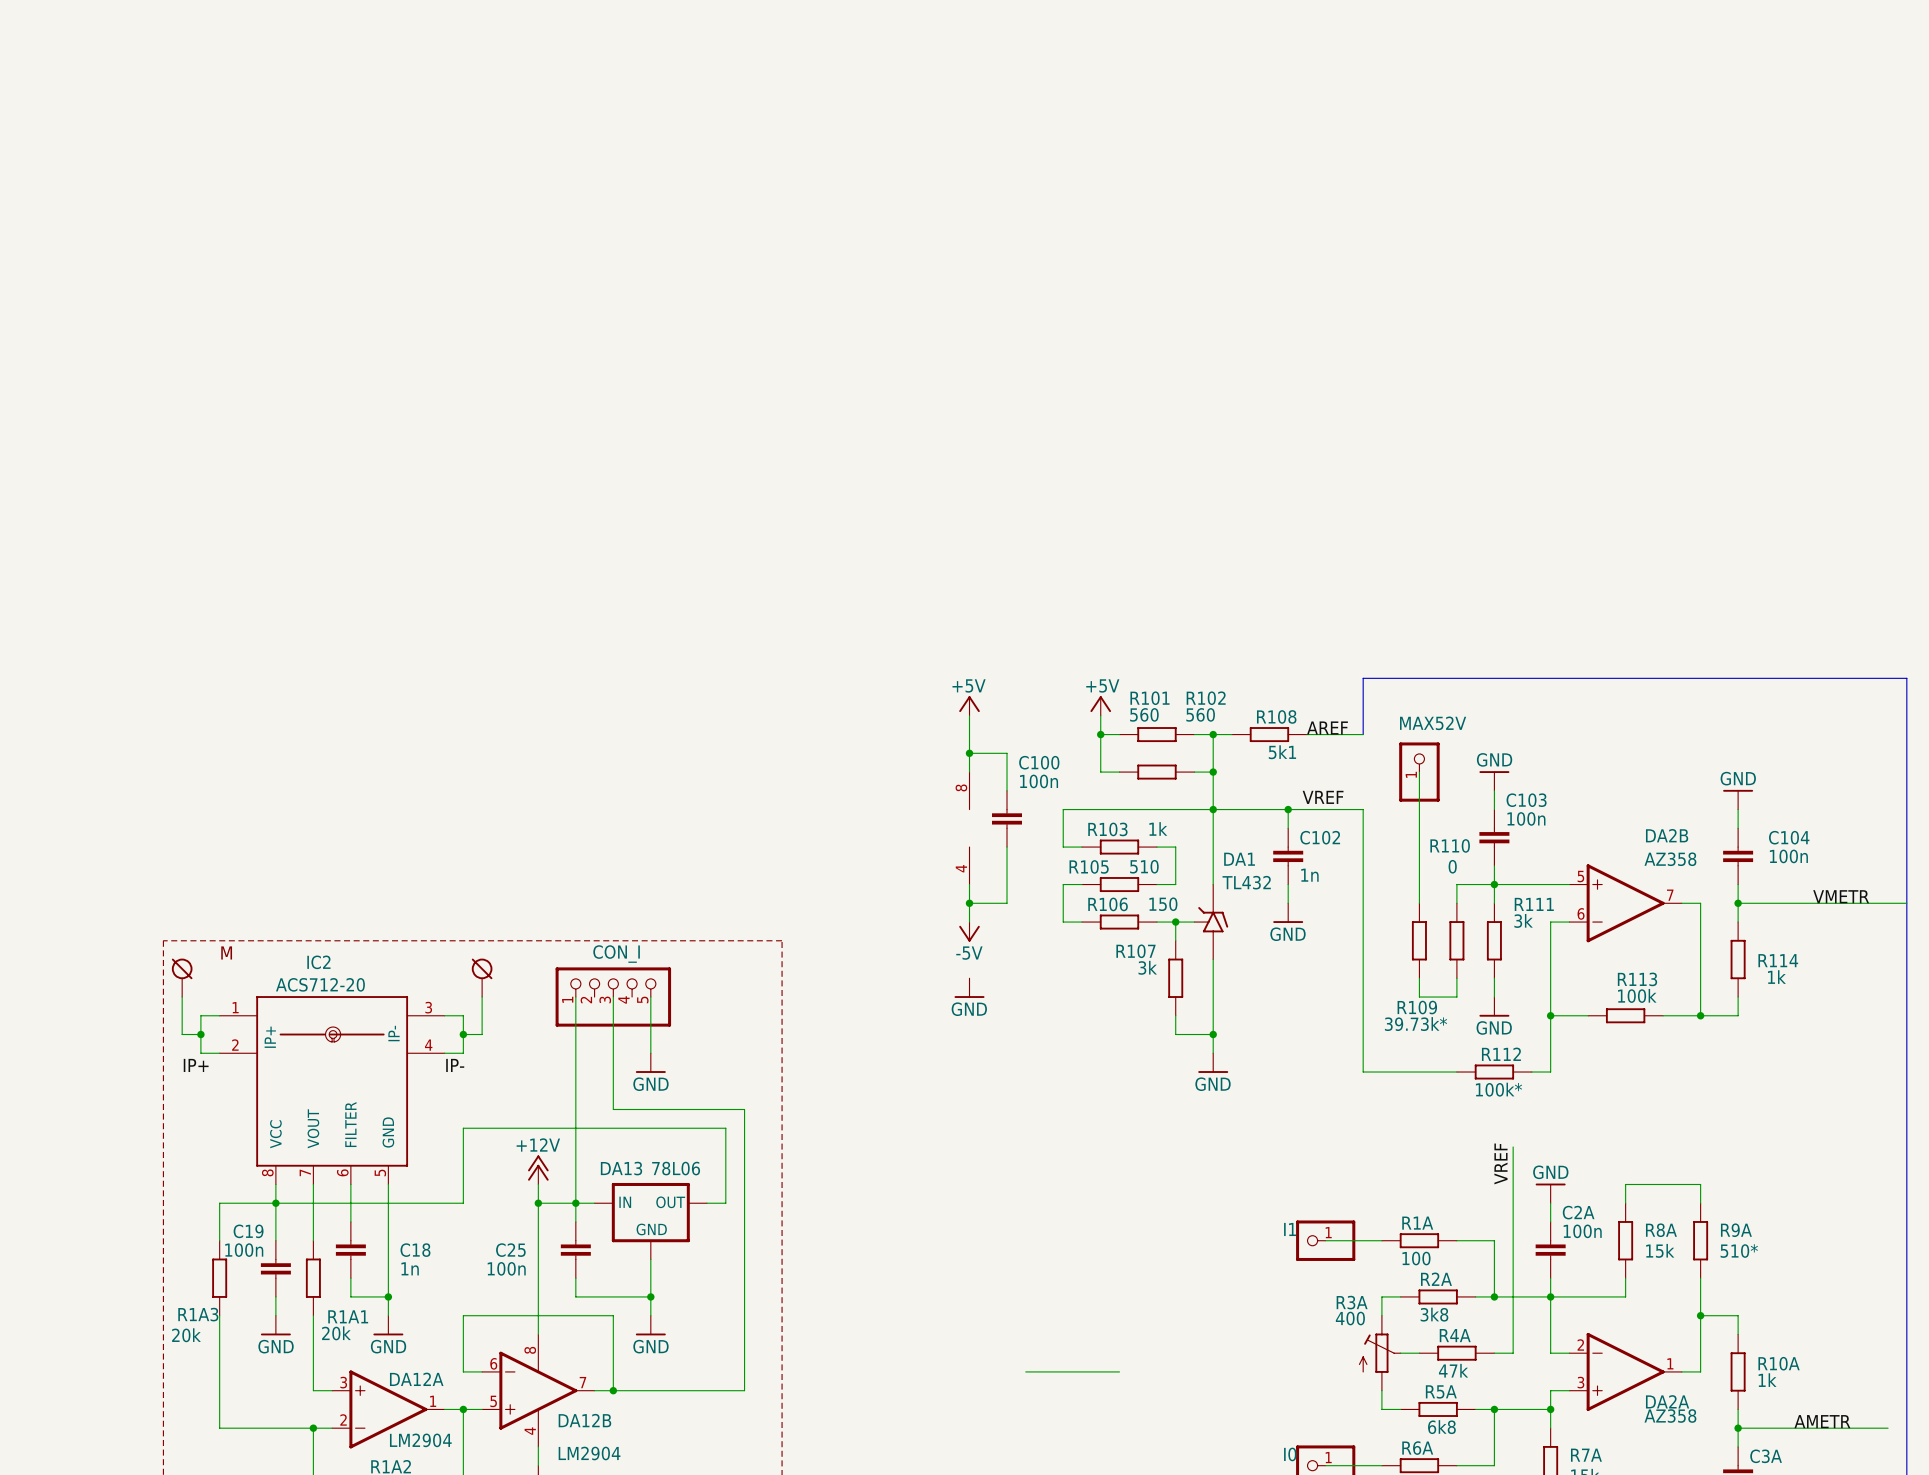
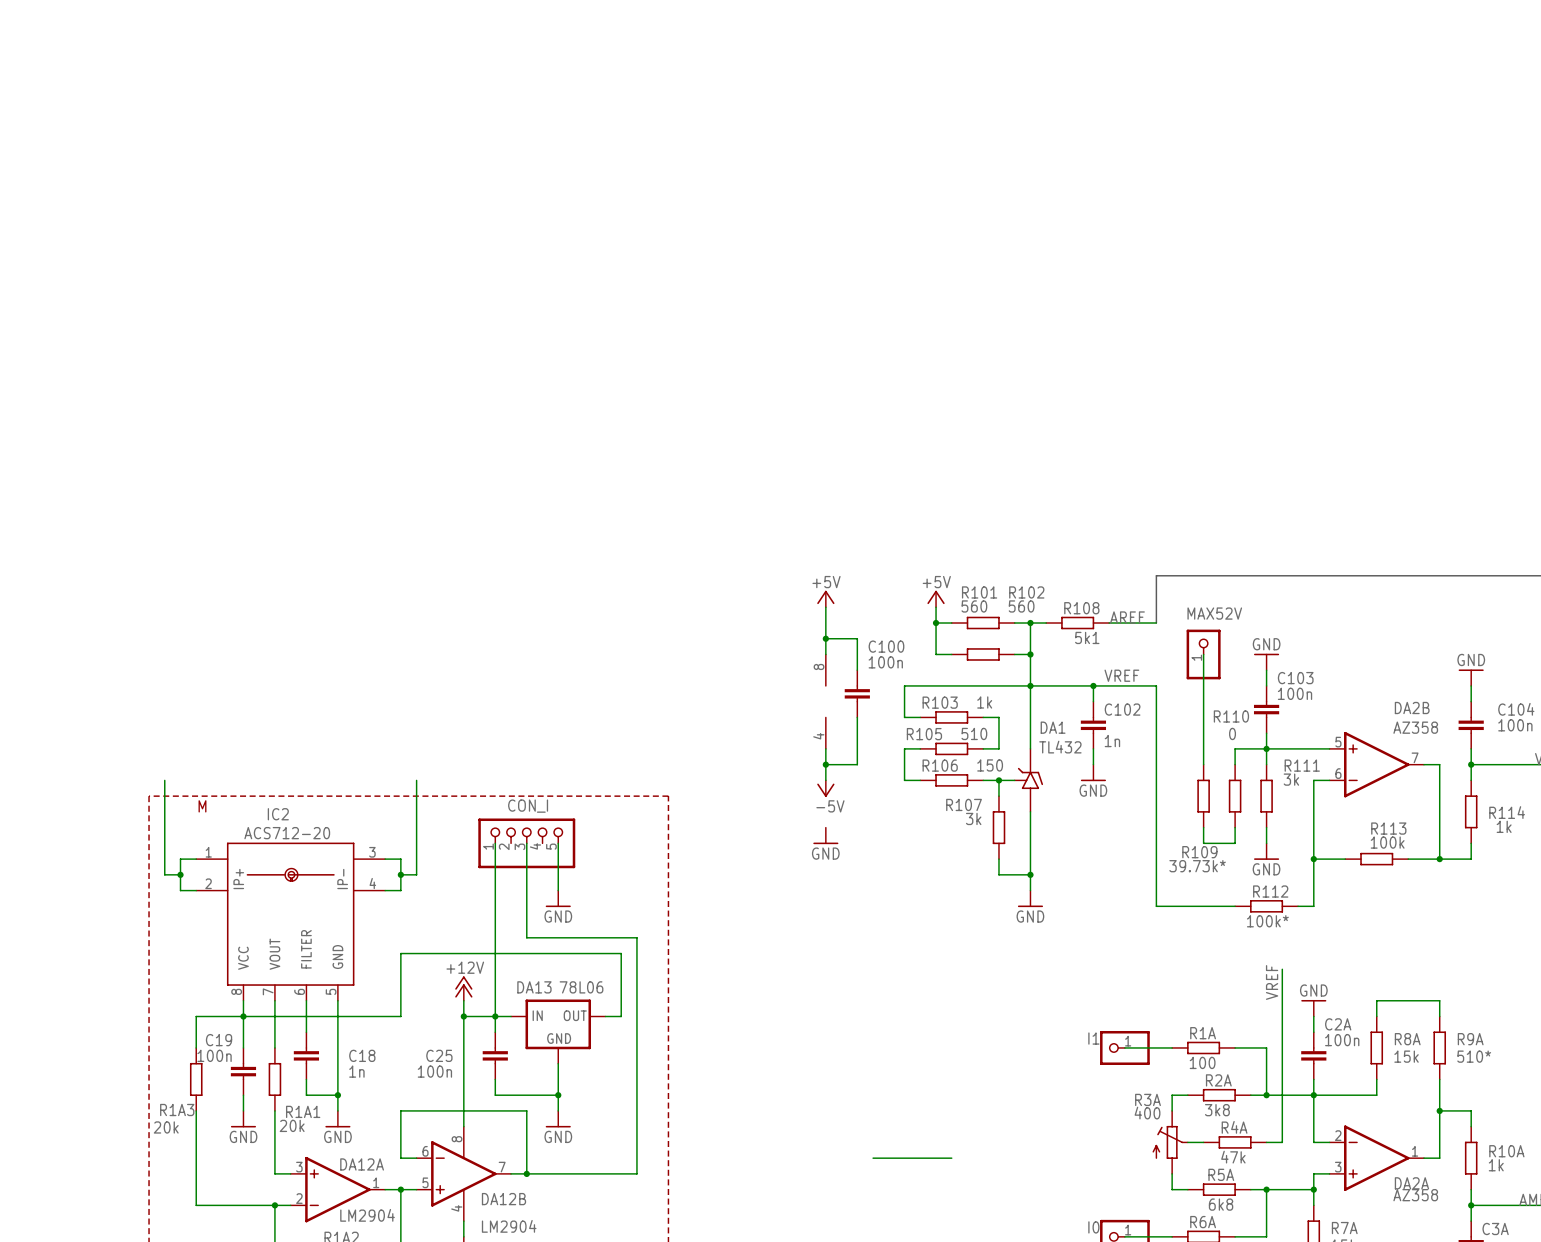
wire: none -> (164, 780) (164, 843)
wire: none -> (416, 780) (416, 843)
part: (182, 977) -> none
part: (482, 977) -> none
label: IP+ (196, 1065) -> none
label: IP- (455, 1065) -> none

